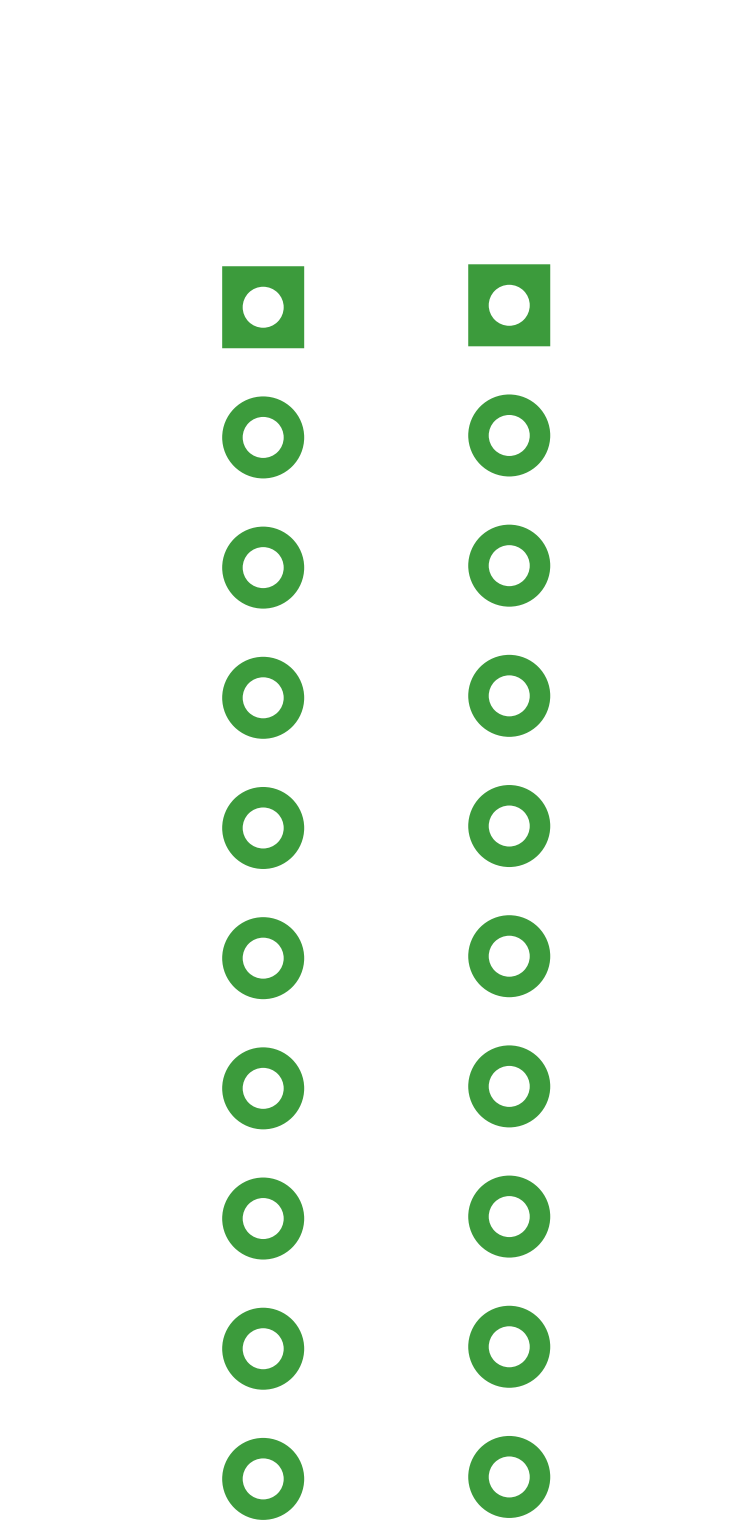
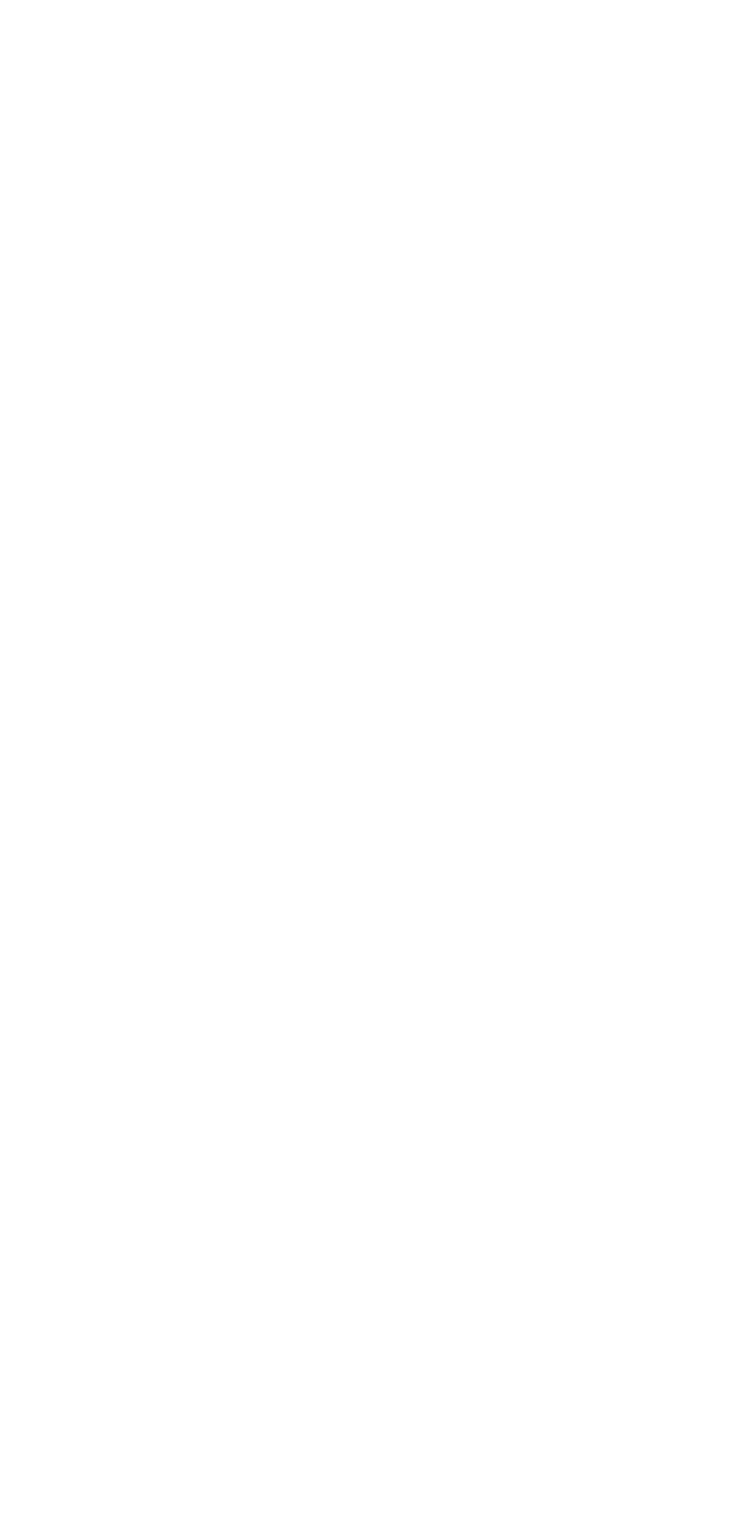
part: (509, 891) -> none
part: (263, 893) -> none

